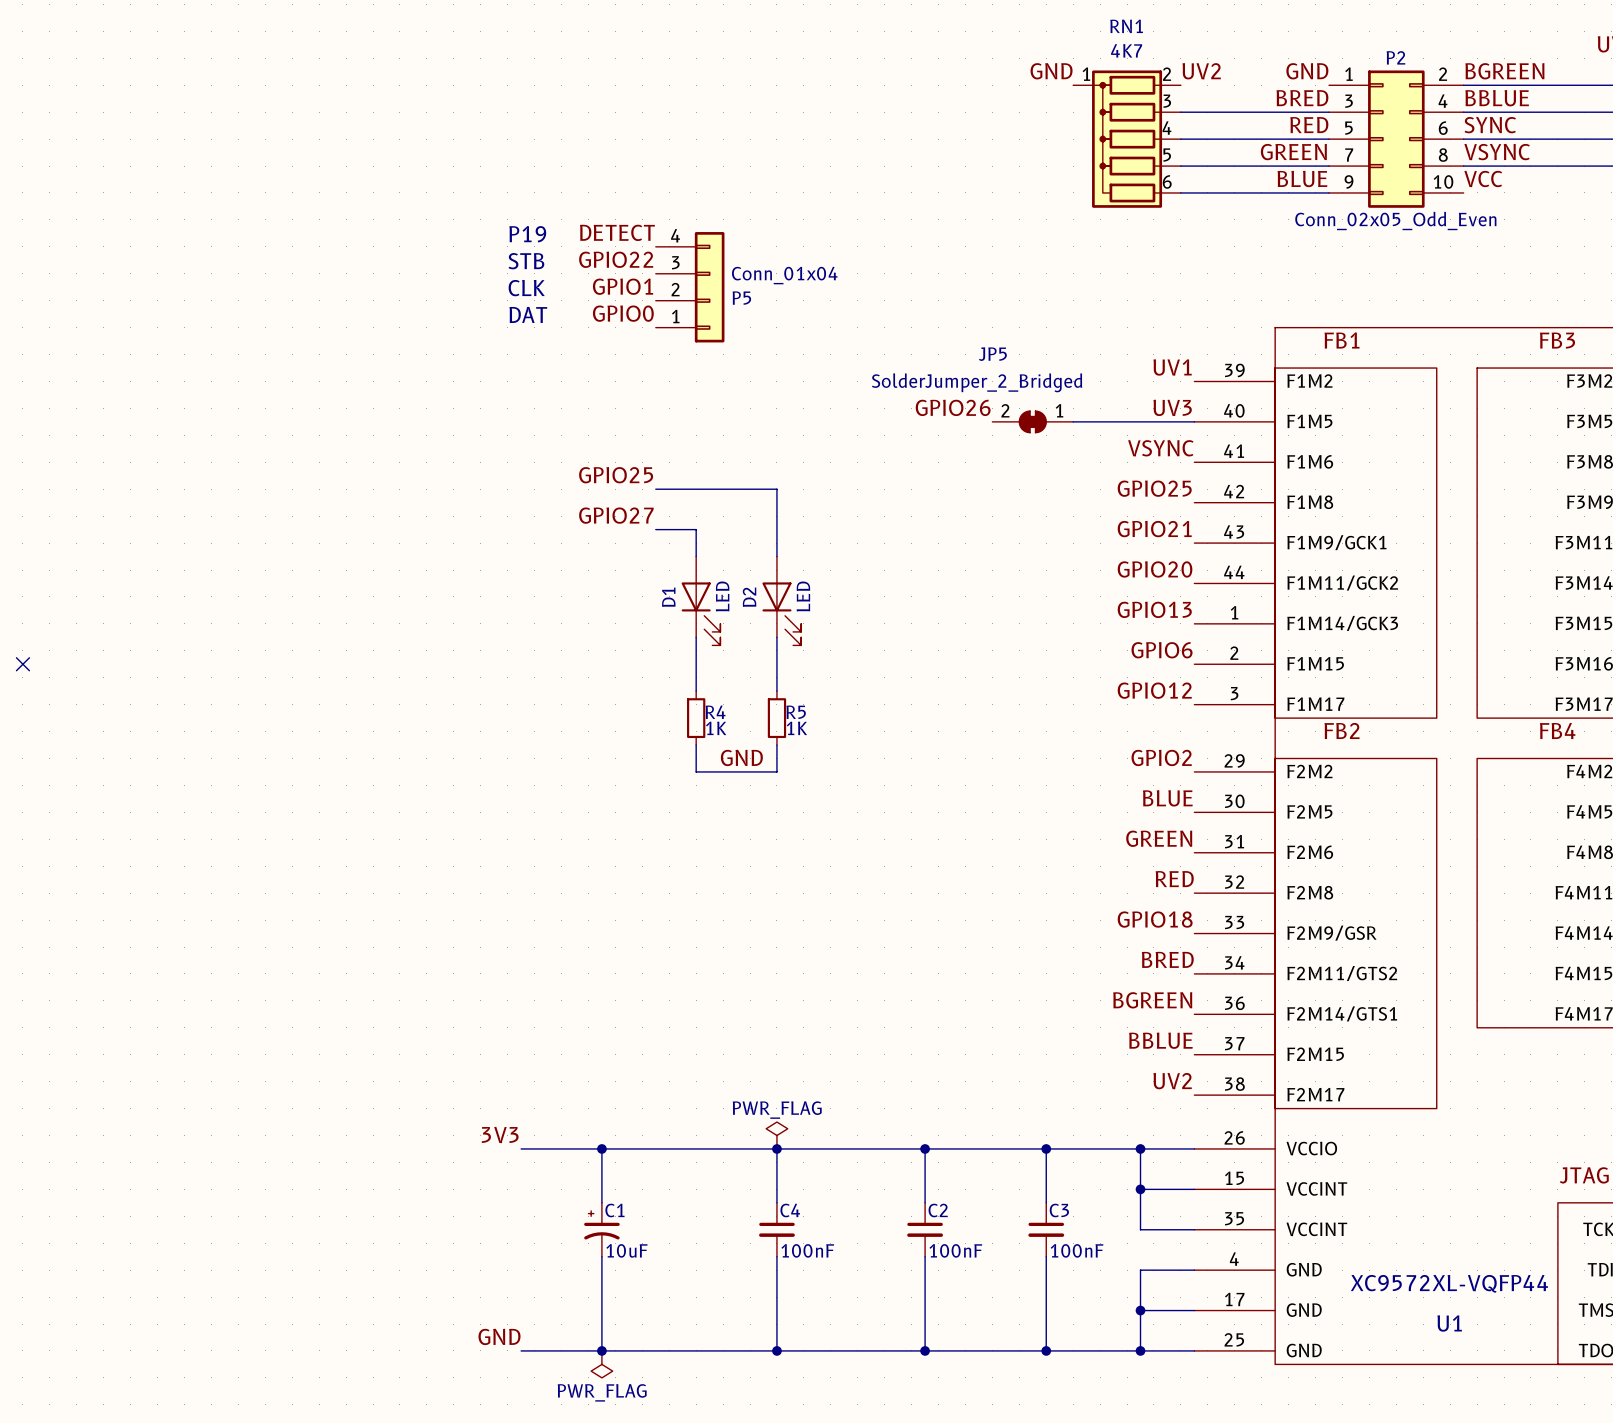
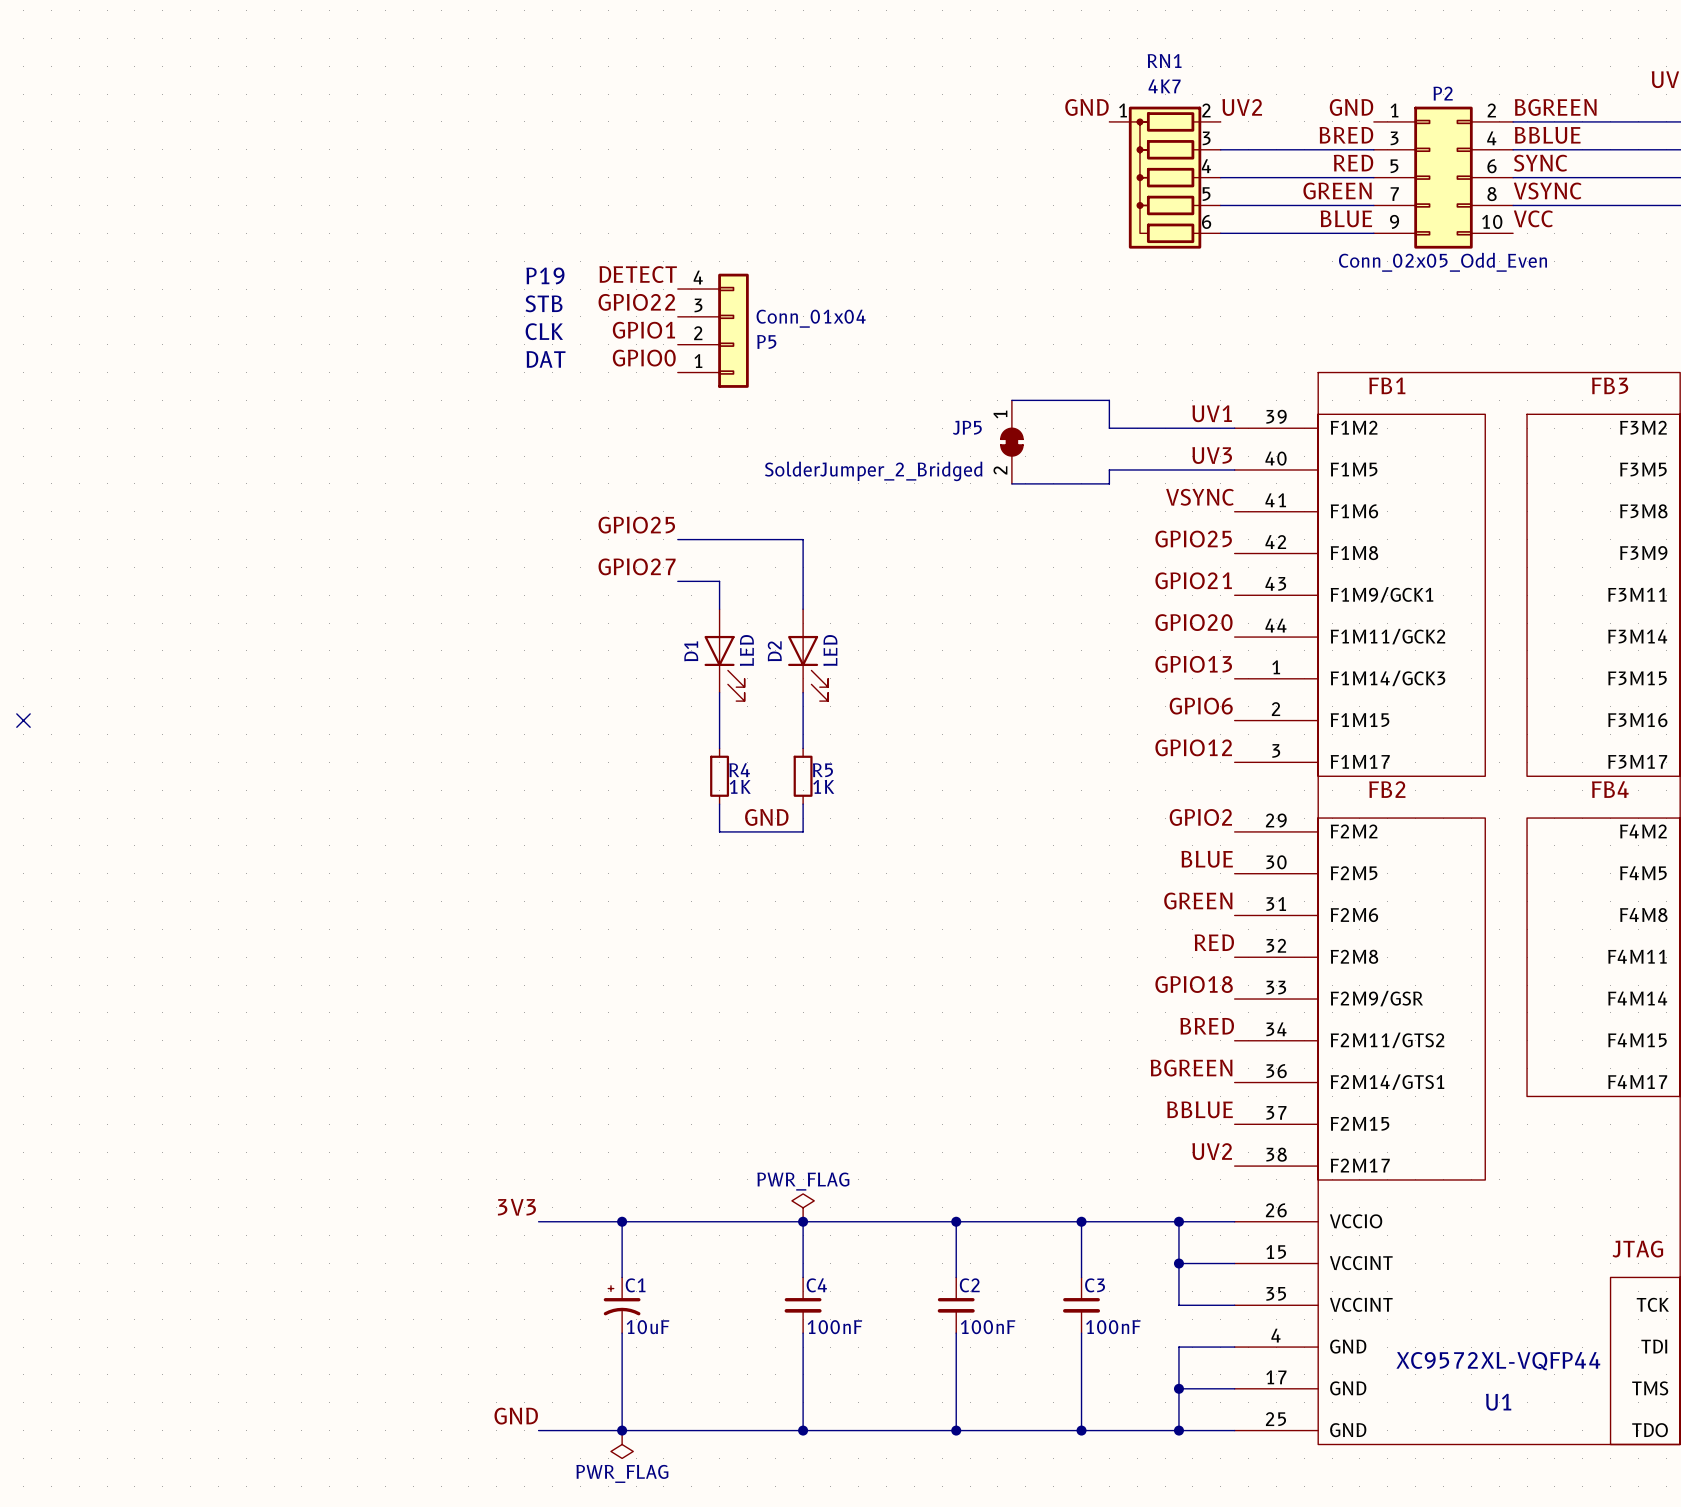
wire: none -> (1011, 400) (1109, 400) (1109, 428) (1234, 428)
JP5 name position: JP5 (992, 354) -> JP5 (967, 427)
JP5 value position: SolderJumper_2_Bridged (977, 382) -> SolderJumper_2_Bridged (873, 471)
label: GPIO26 (953, 407) -> none
JP5 rotation: 0° (1032, 421) -> 90° counterclockwise (1011, 442)
JP5 position: (1032, 421) -> (1011, 442)
wire: none -> (1109, 469) (1109, 483) (1011, 483)

